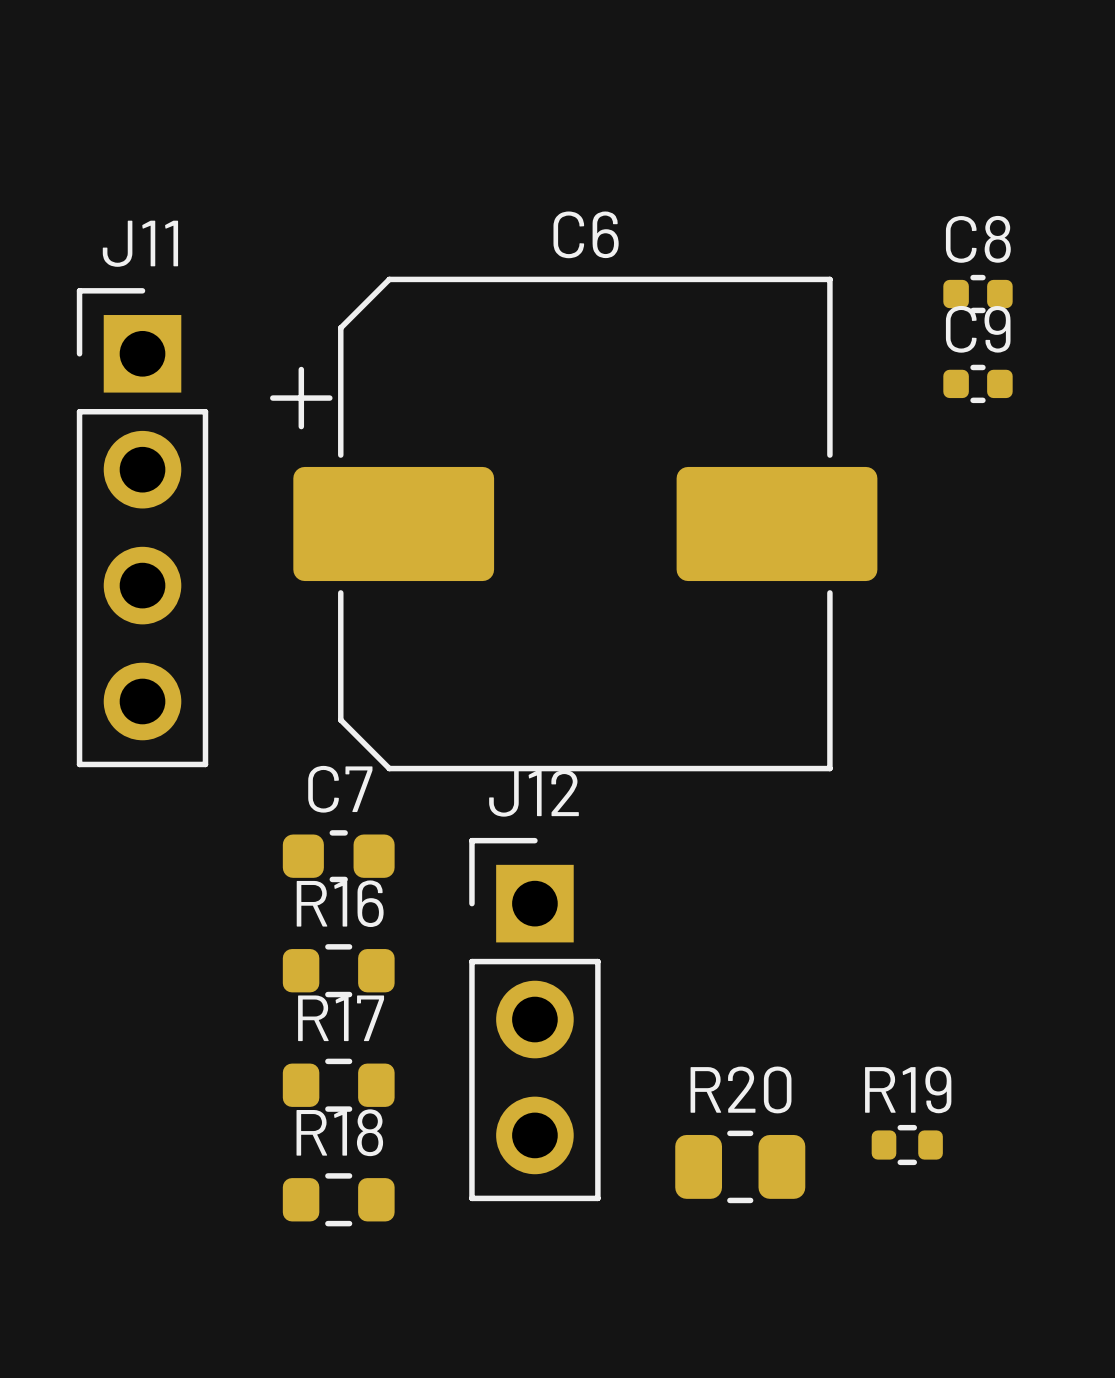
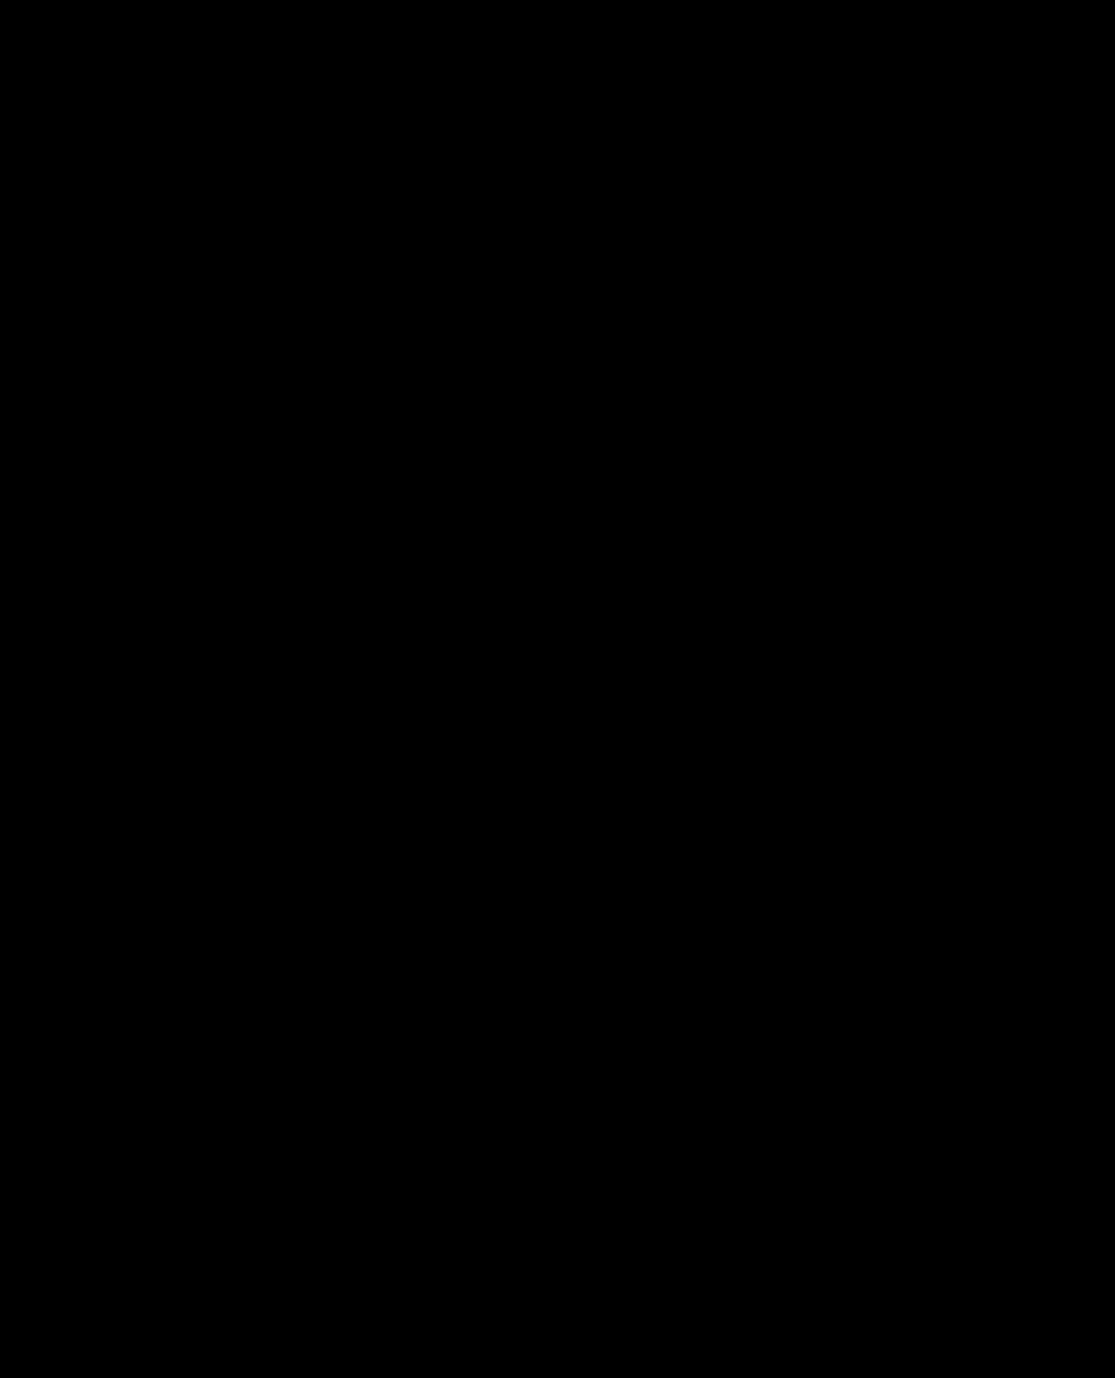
C8: (977, 294) -> none
C9: (977, 383) -> none
C6: (573, 523) -> none
J11: (142, 527) -> none
C7: (338, 856) -> none
R16: (338, 970) -> none
J12: (534, 1019) -> none
R17: (338, 1085) -> none
R19: (907, 1145) -> none
R20: (740, 1166) -> none
R18: (338, 1199) -> none

